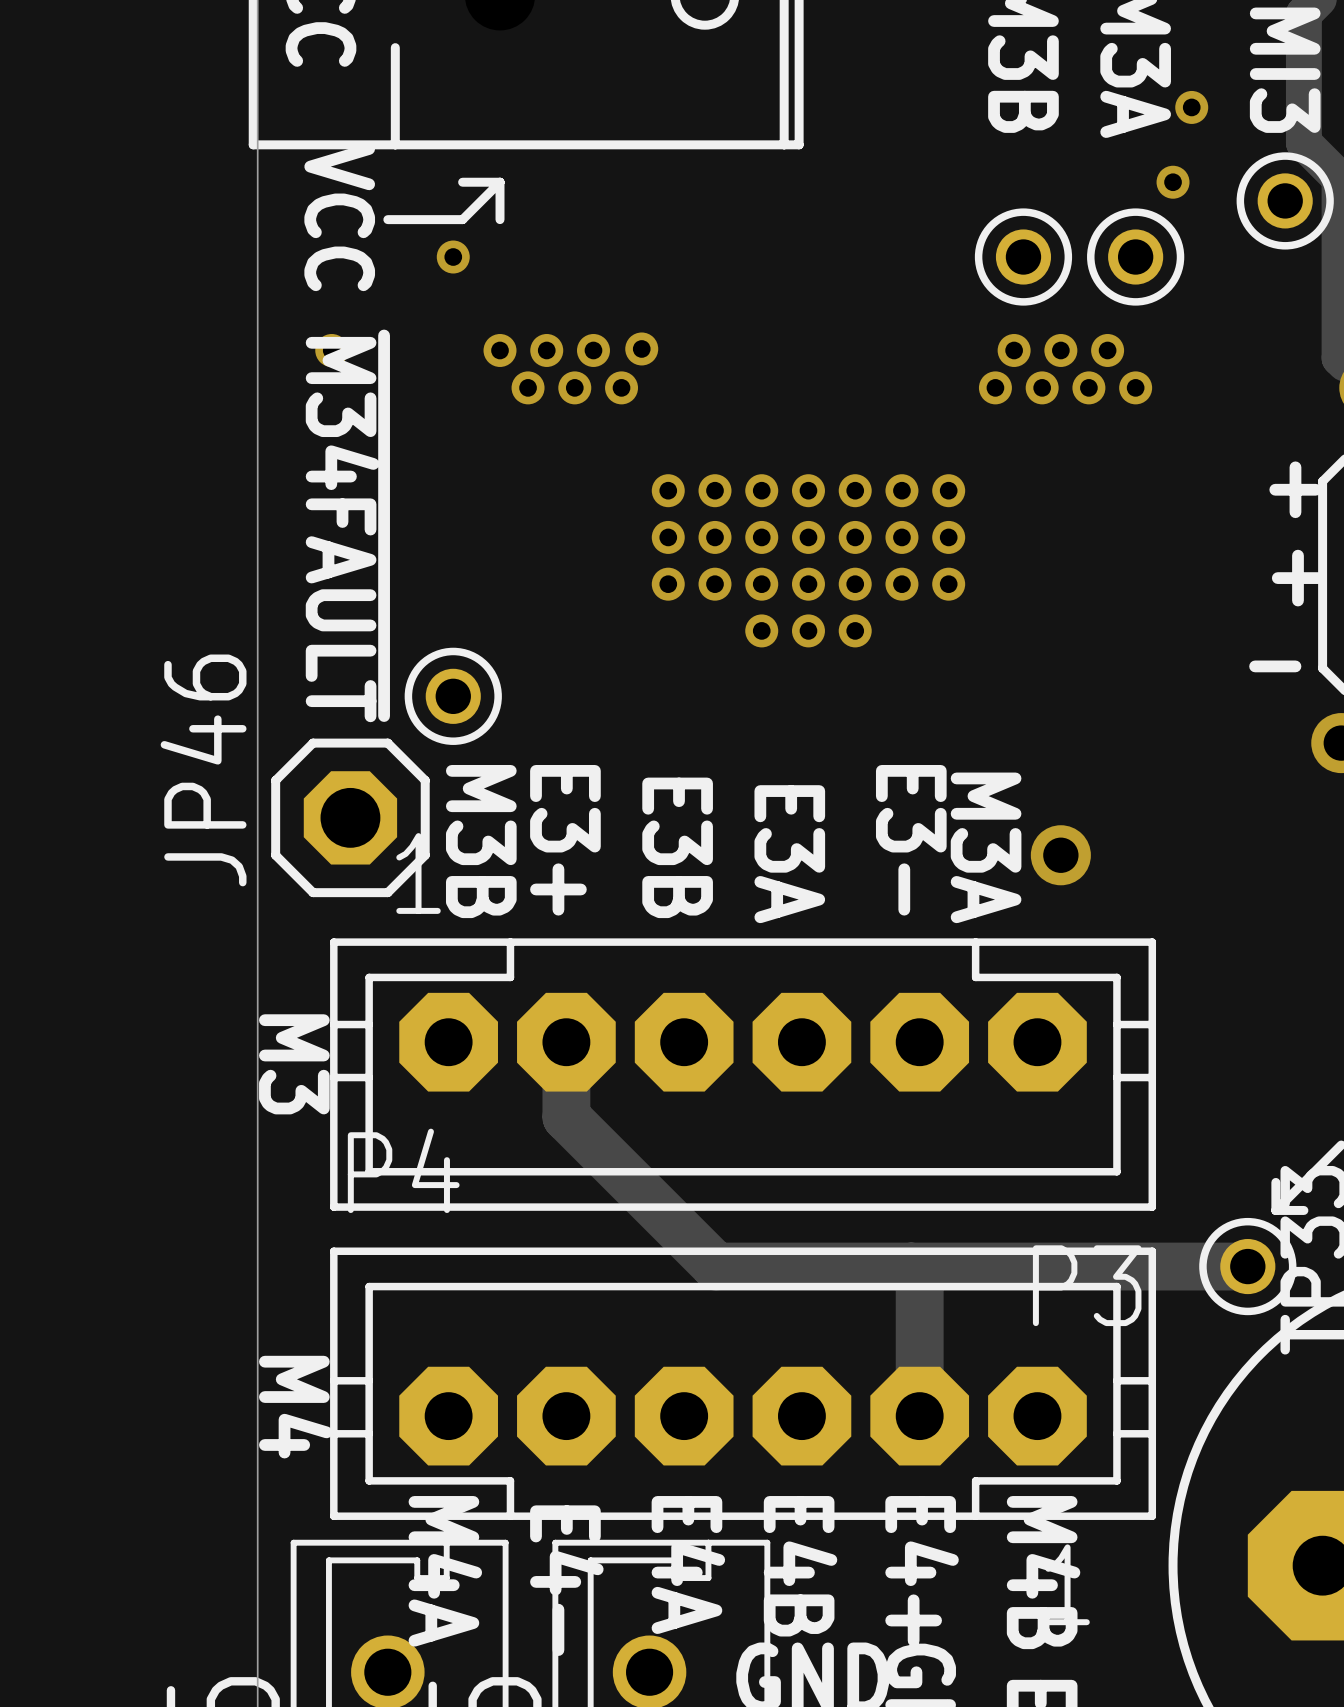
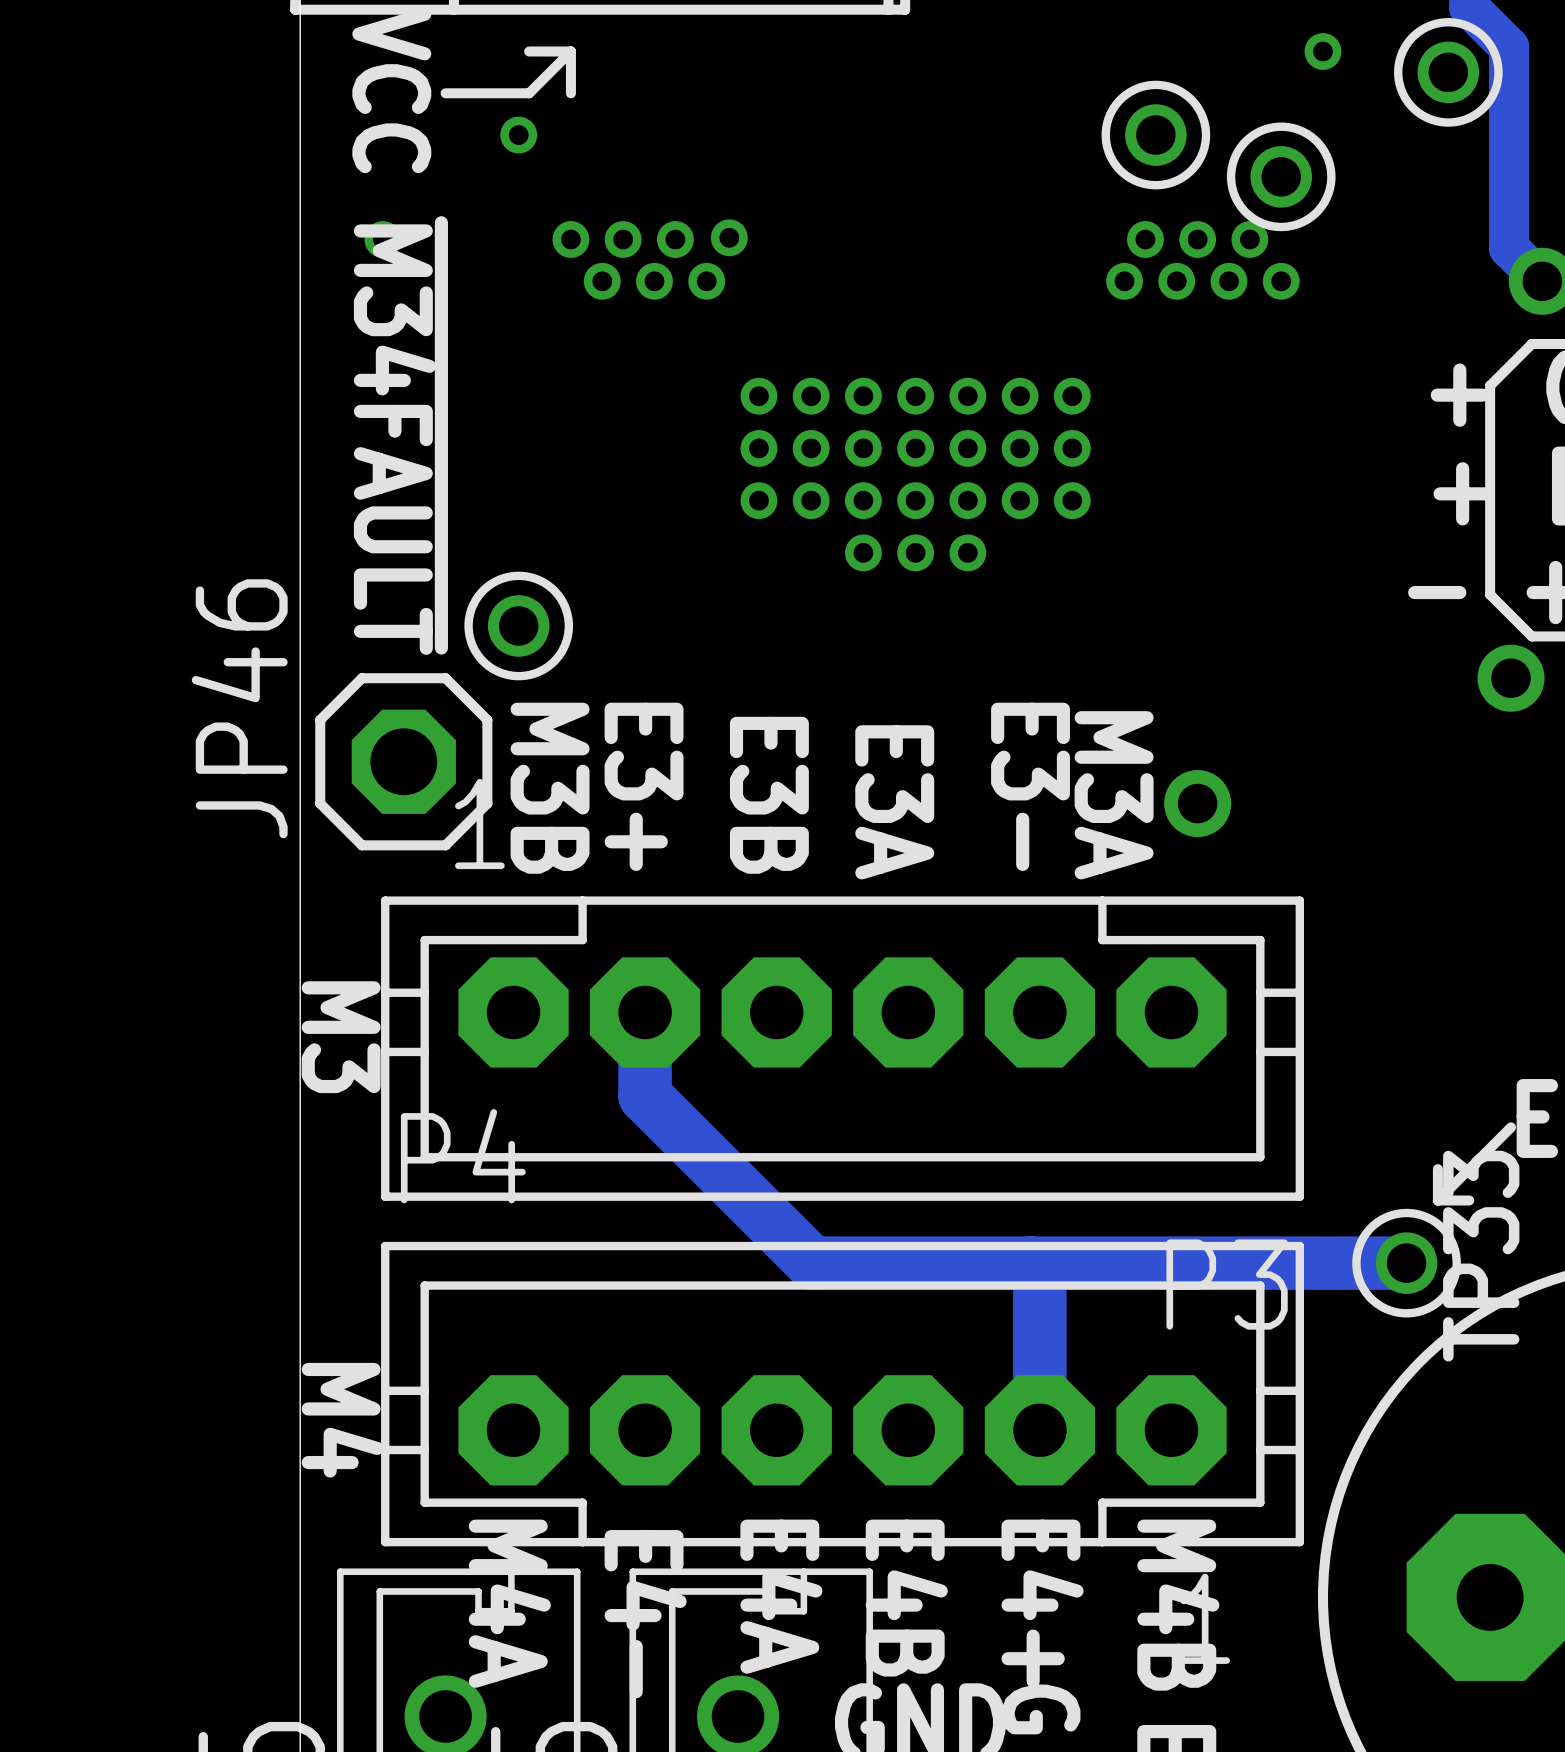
part position: (1135, 257) -> (1281, 176)

